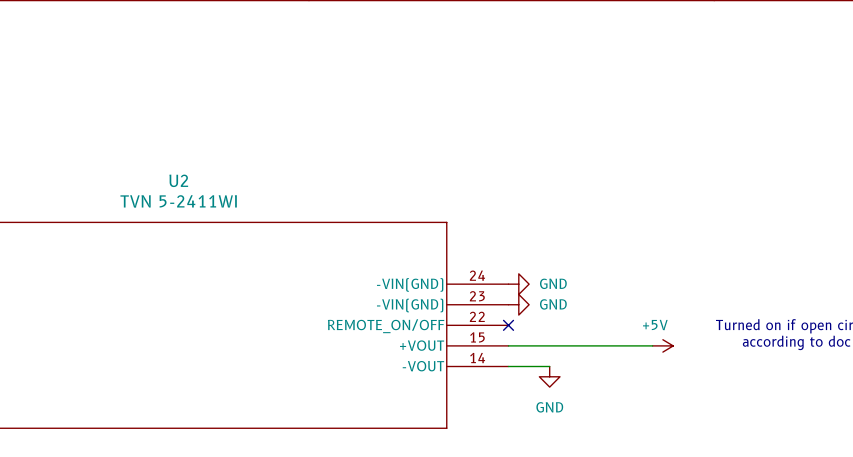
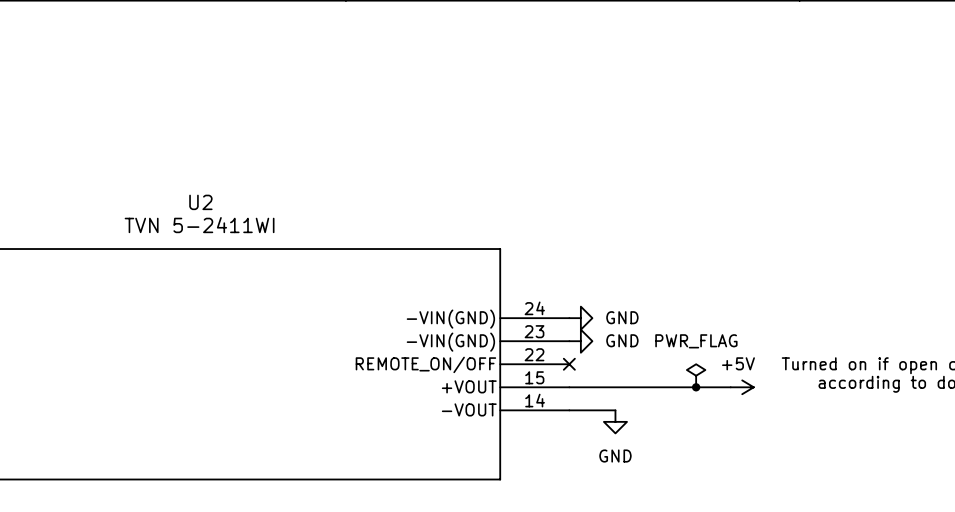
power symbol: none -> PWR_FLAG (696, 375)
junction: none -> (696, 387)

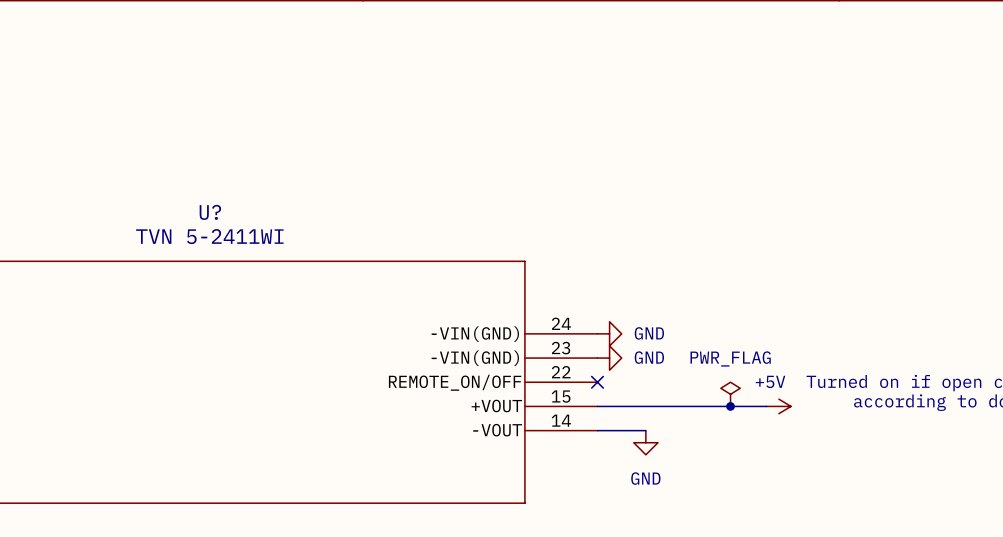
U2 name: U2 (200, 202) -> U? (210, 212)

